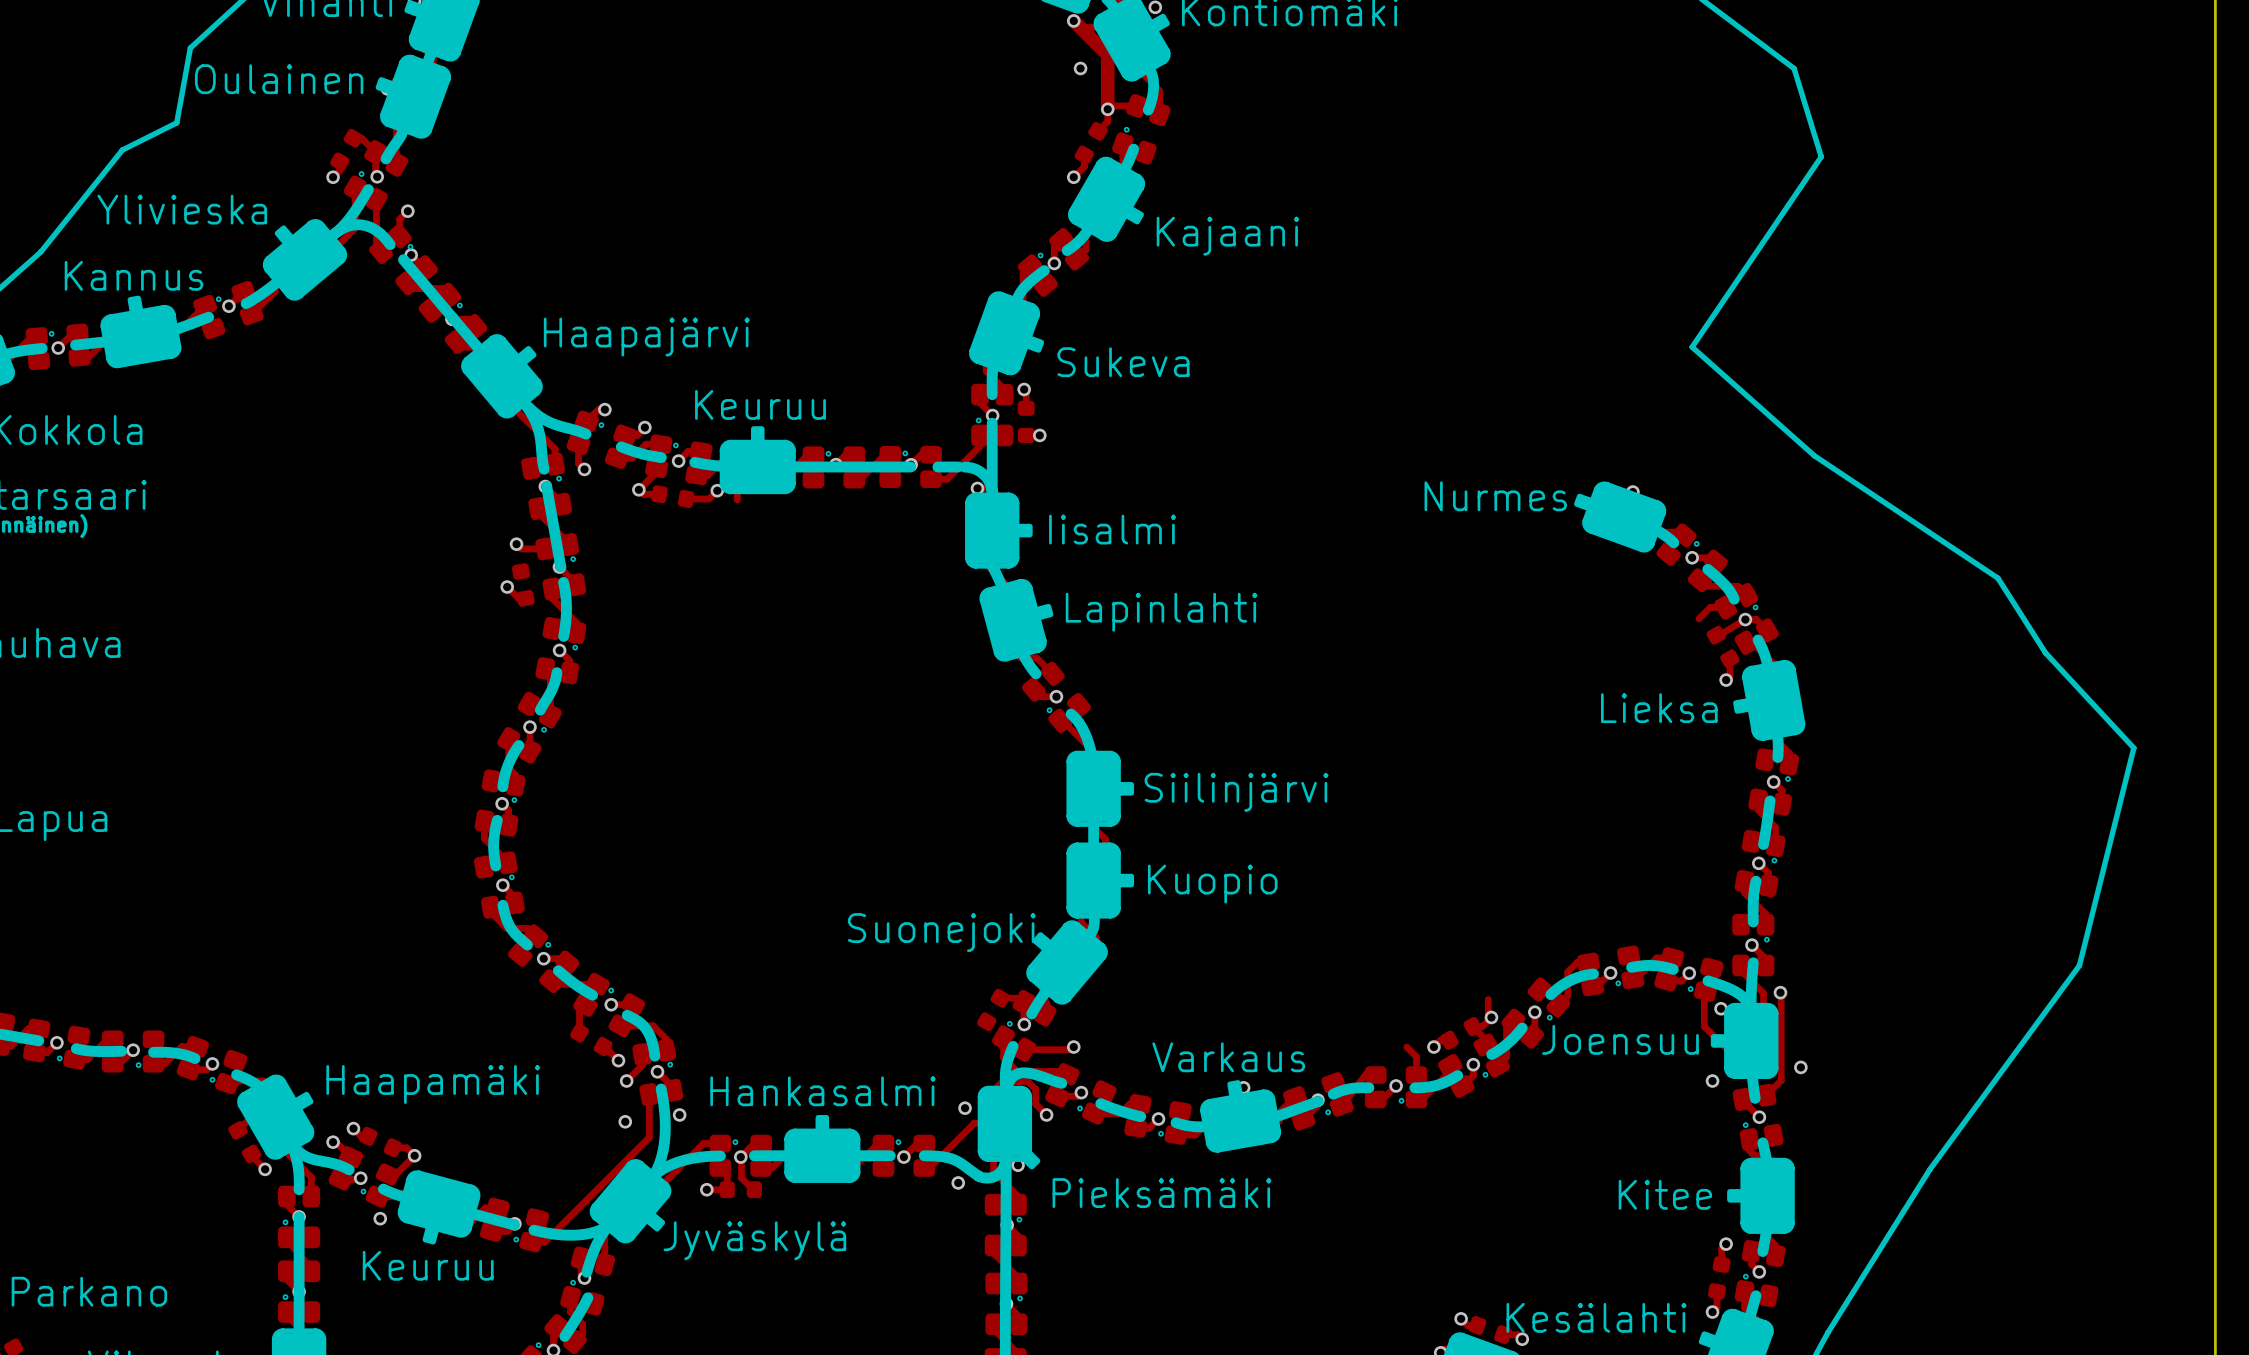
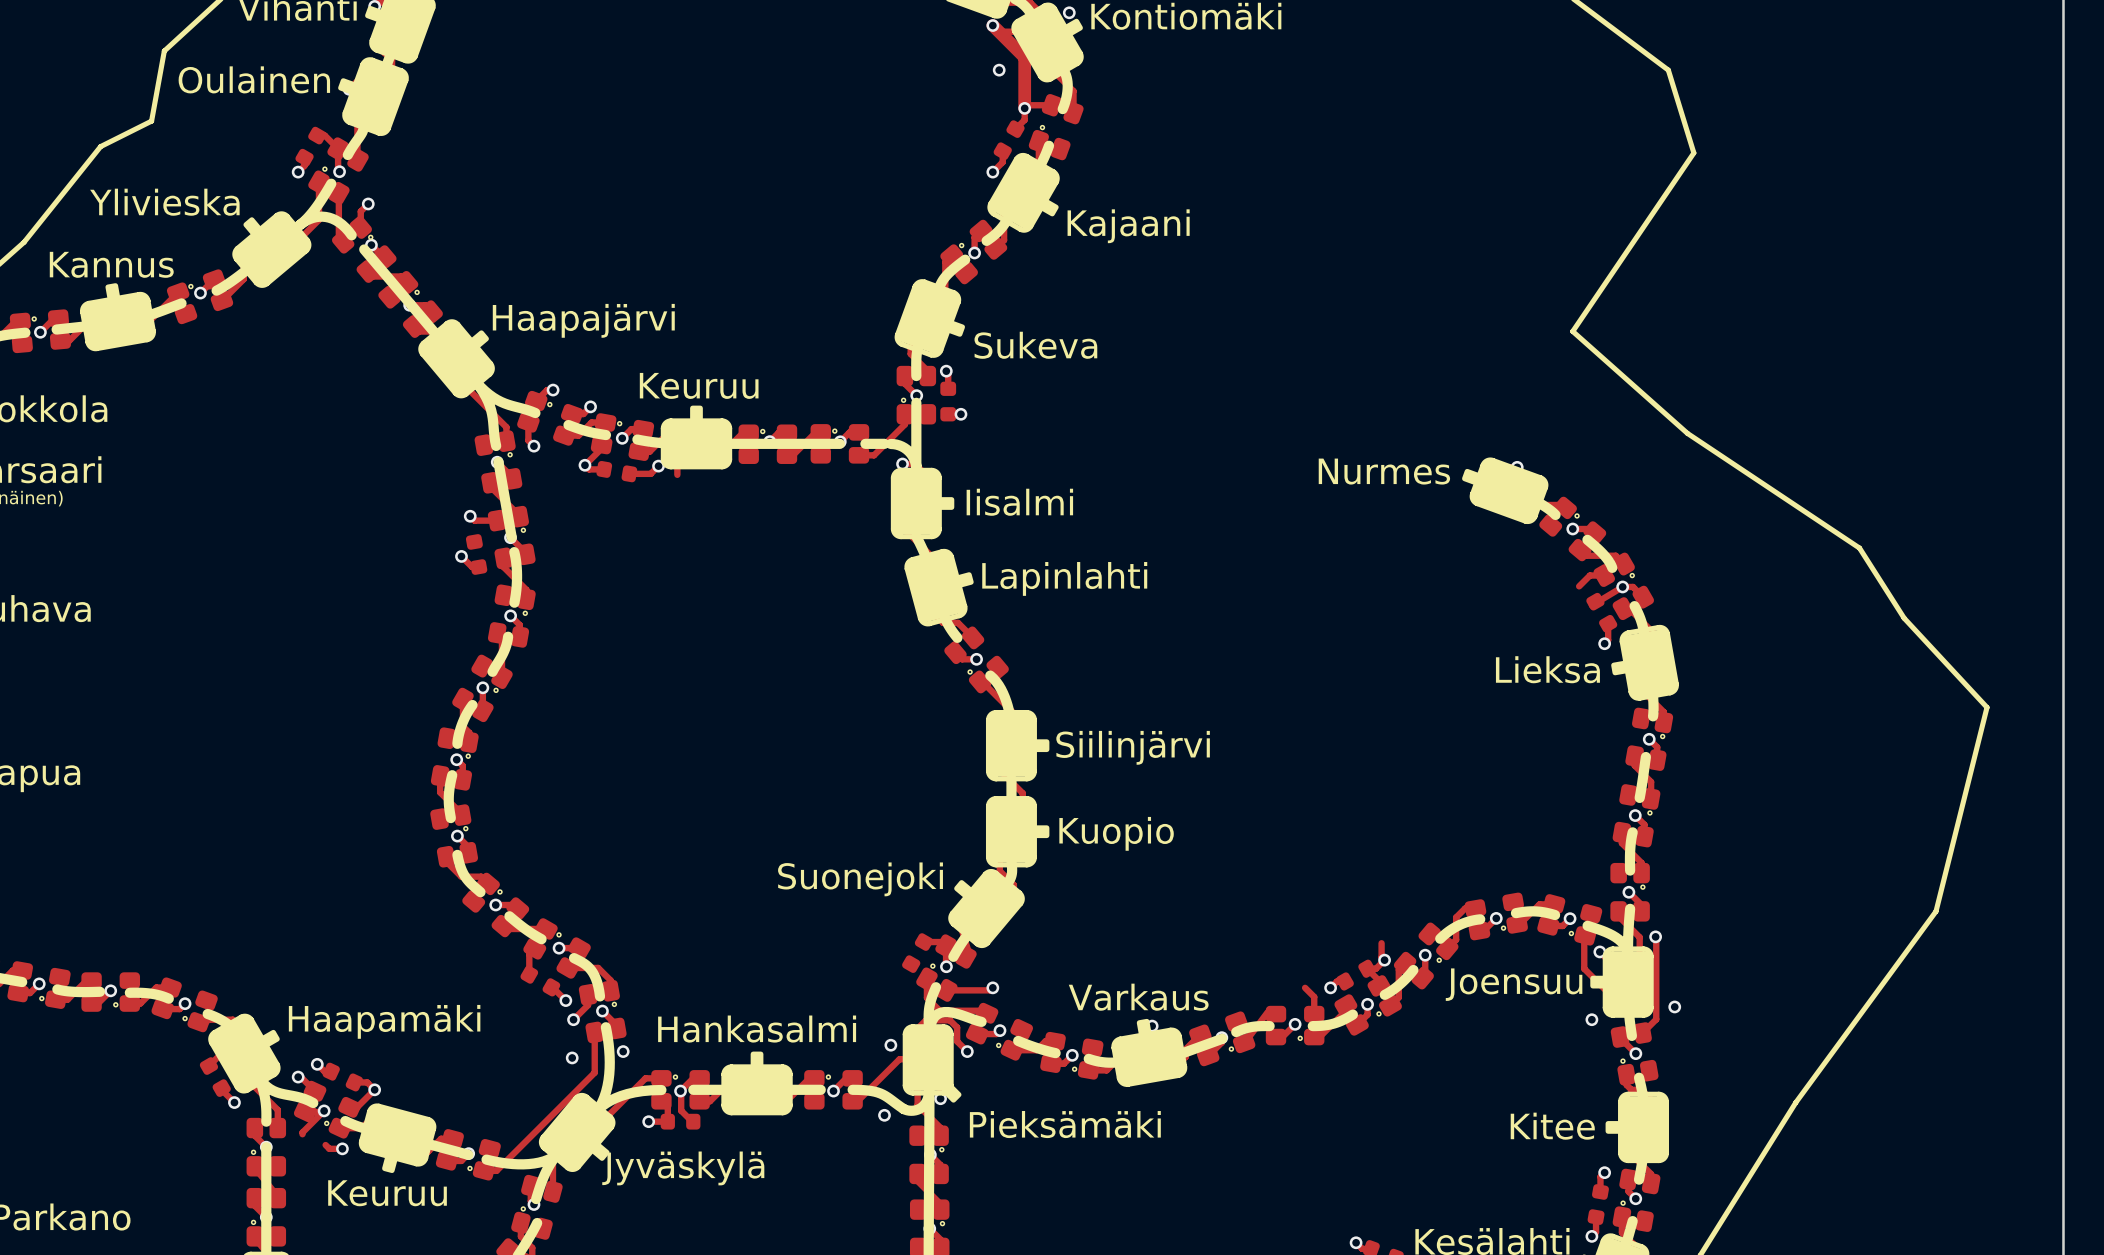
track: none -> (323, 1112) (302, 1134)
track: none -> (325, 1145) (329, 1148) (342, 1148)

